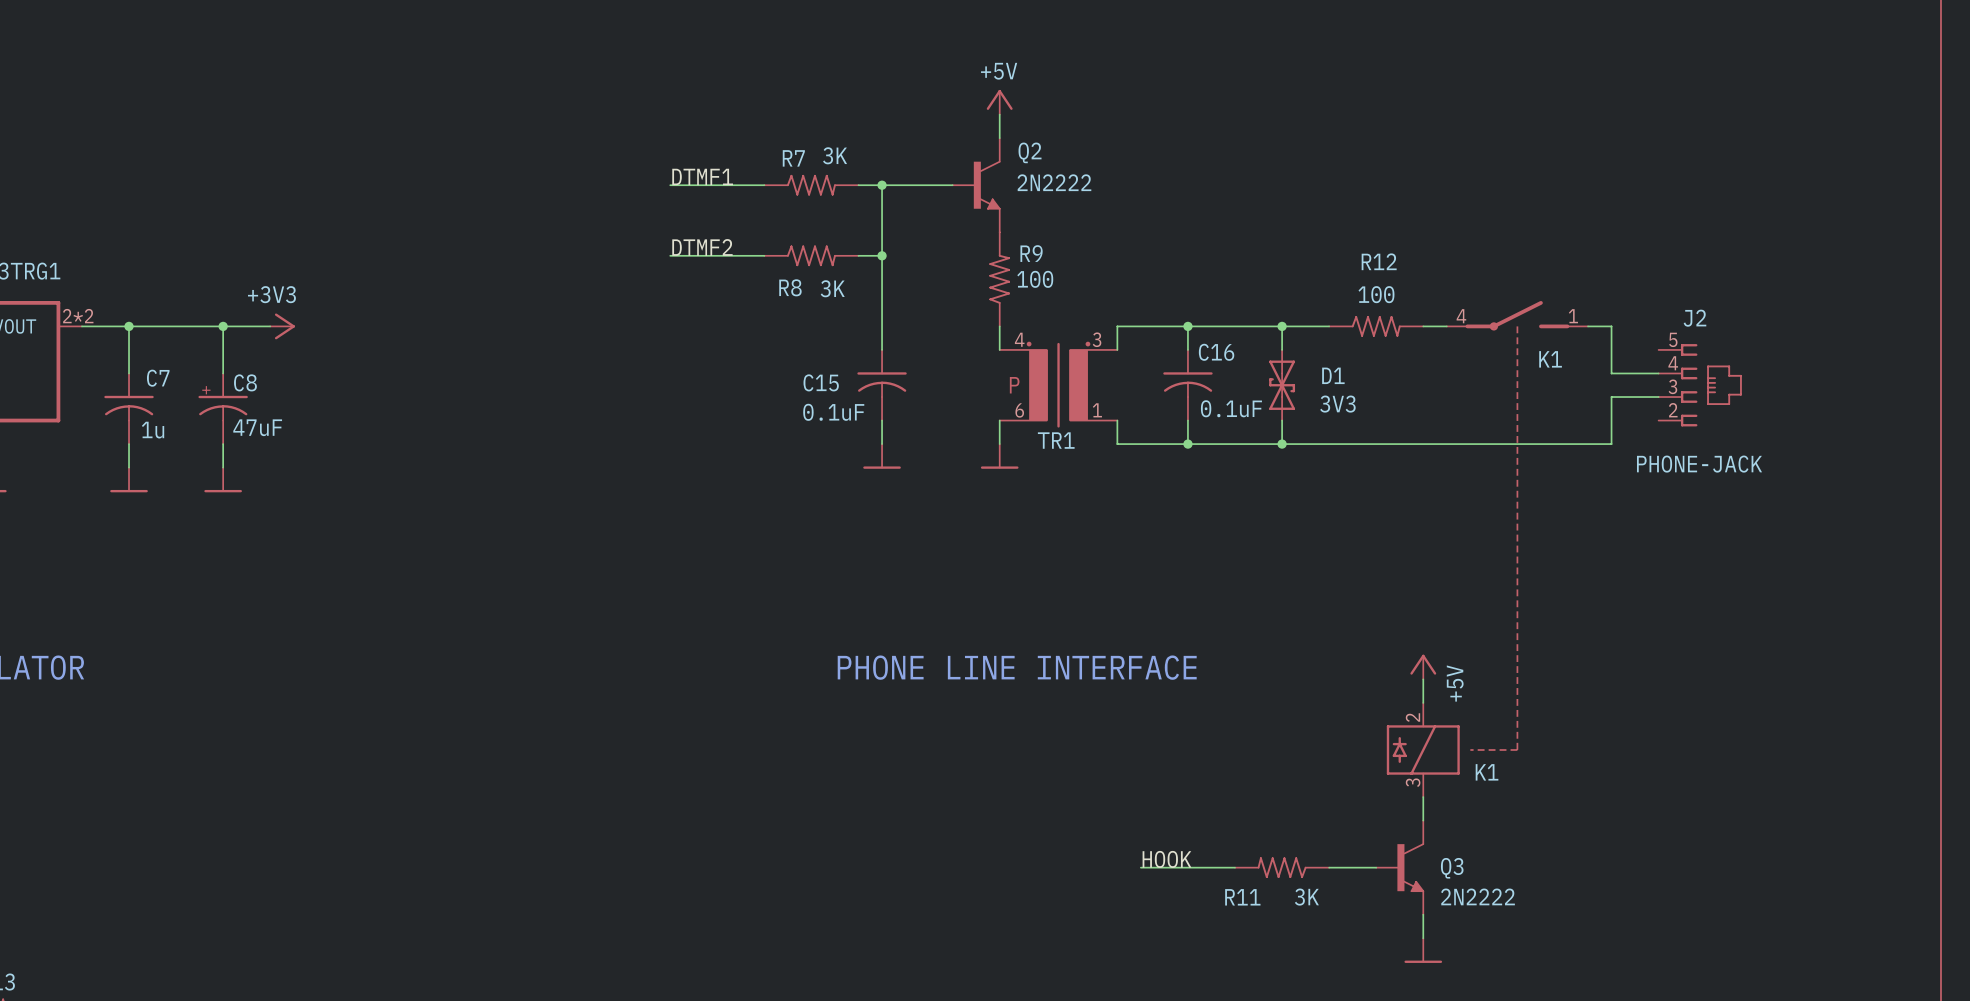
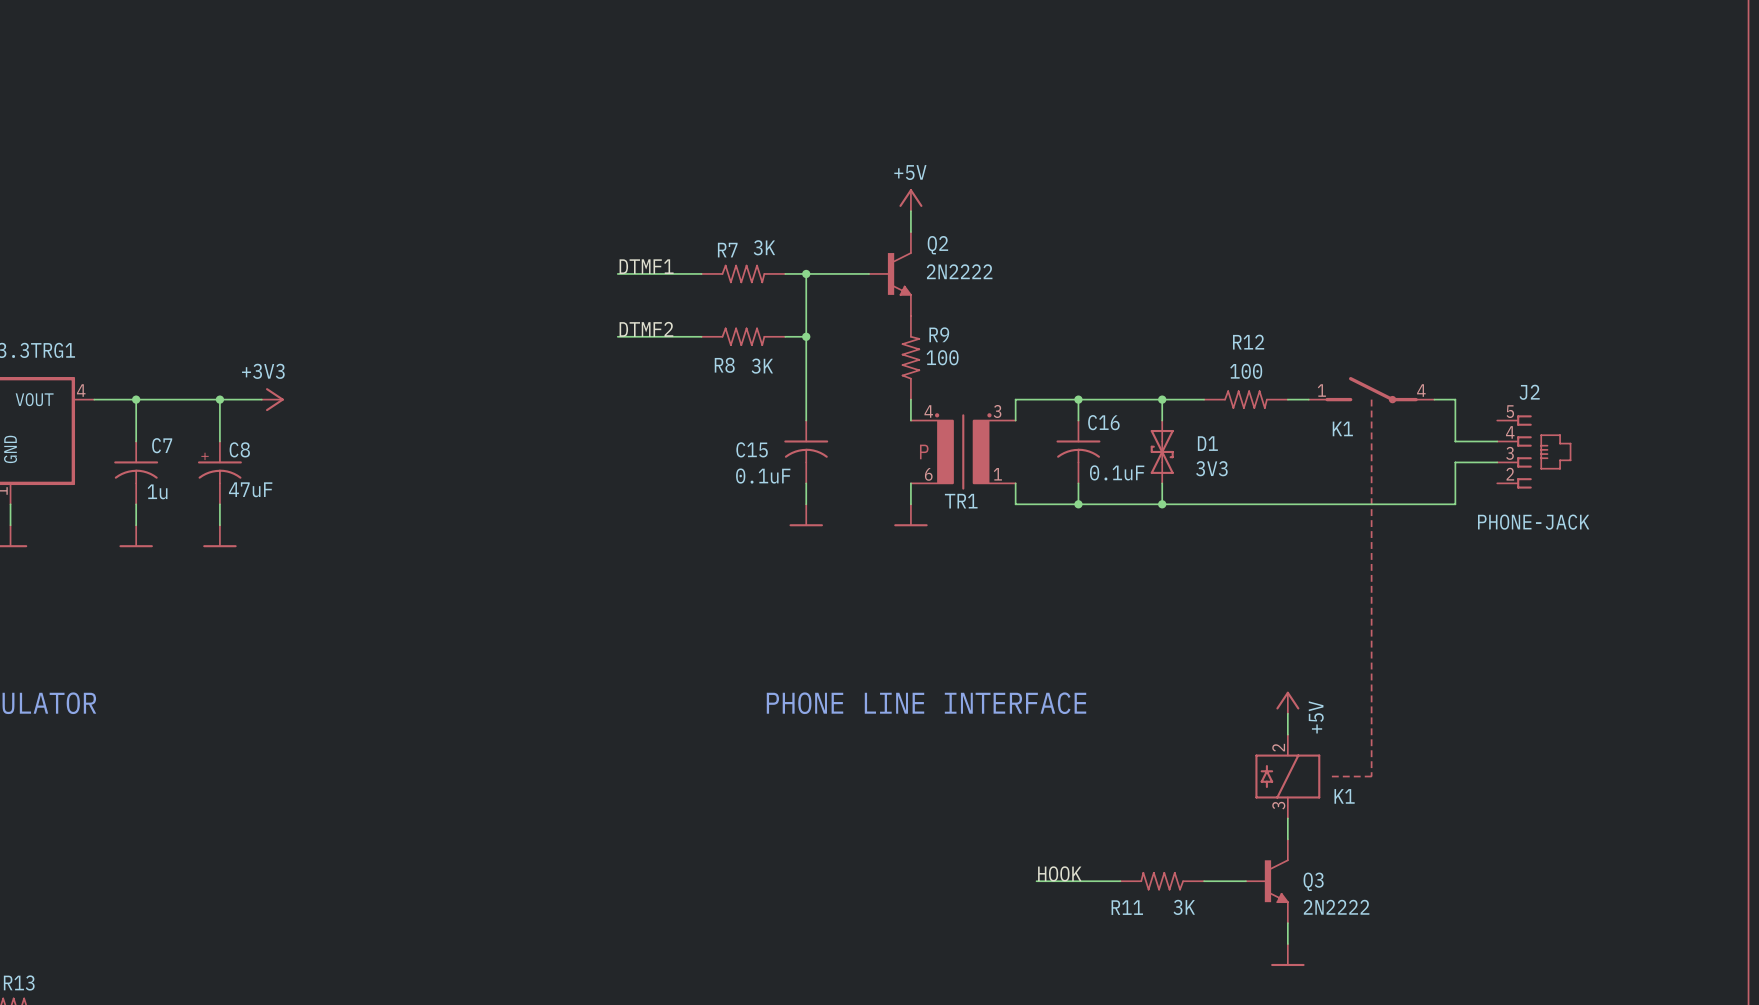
K1 flip: as is (1517, 315) -> left-right (1371, 390)
part pin number: 2*2 (78, 316) -> 4 (81, 390)

